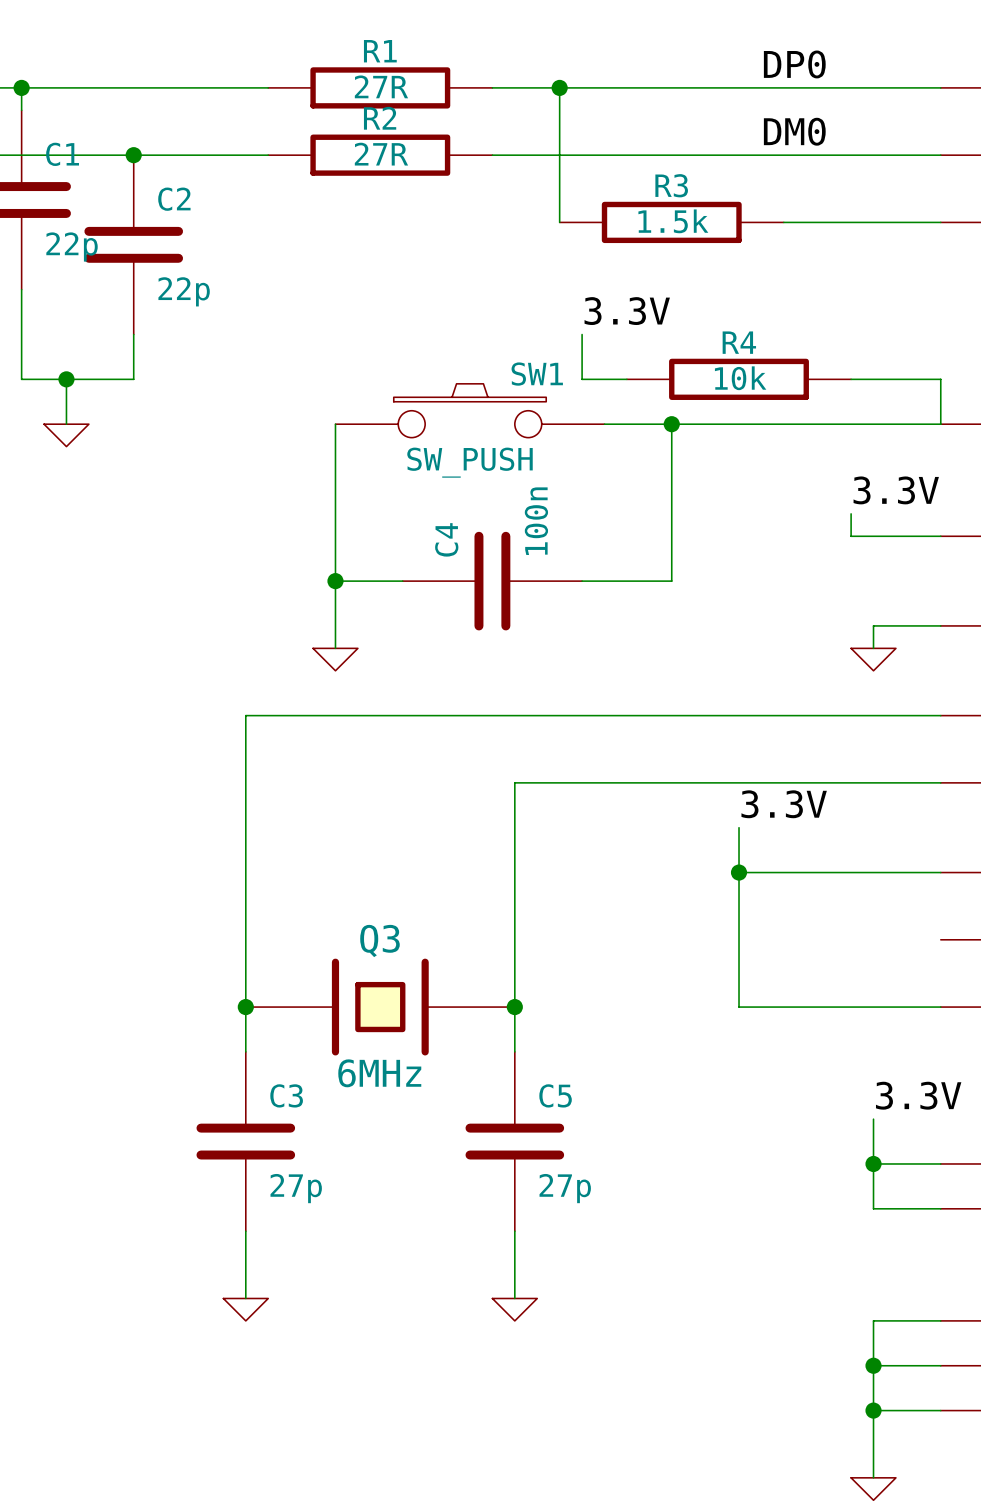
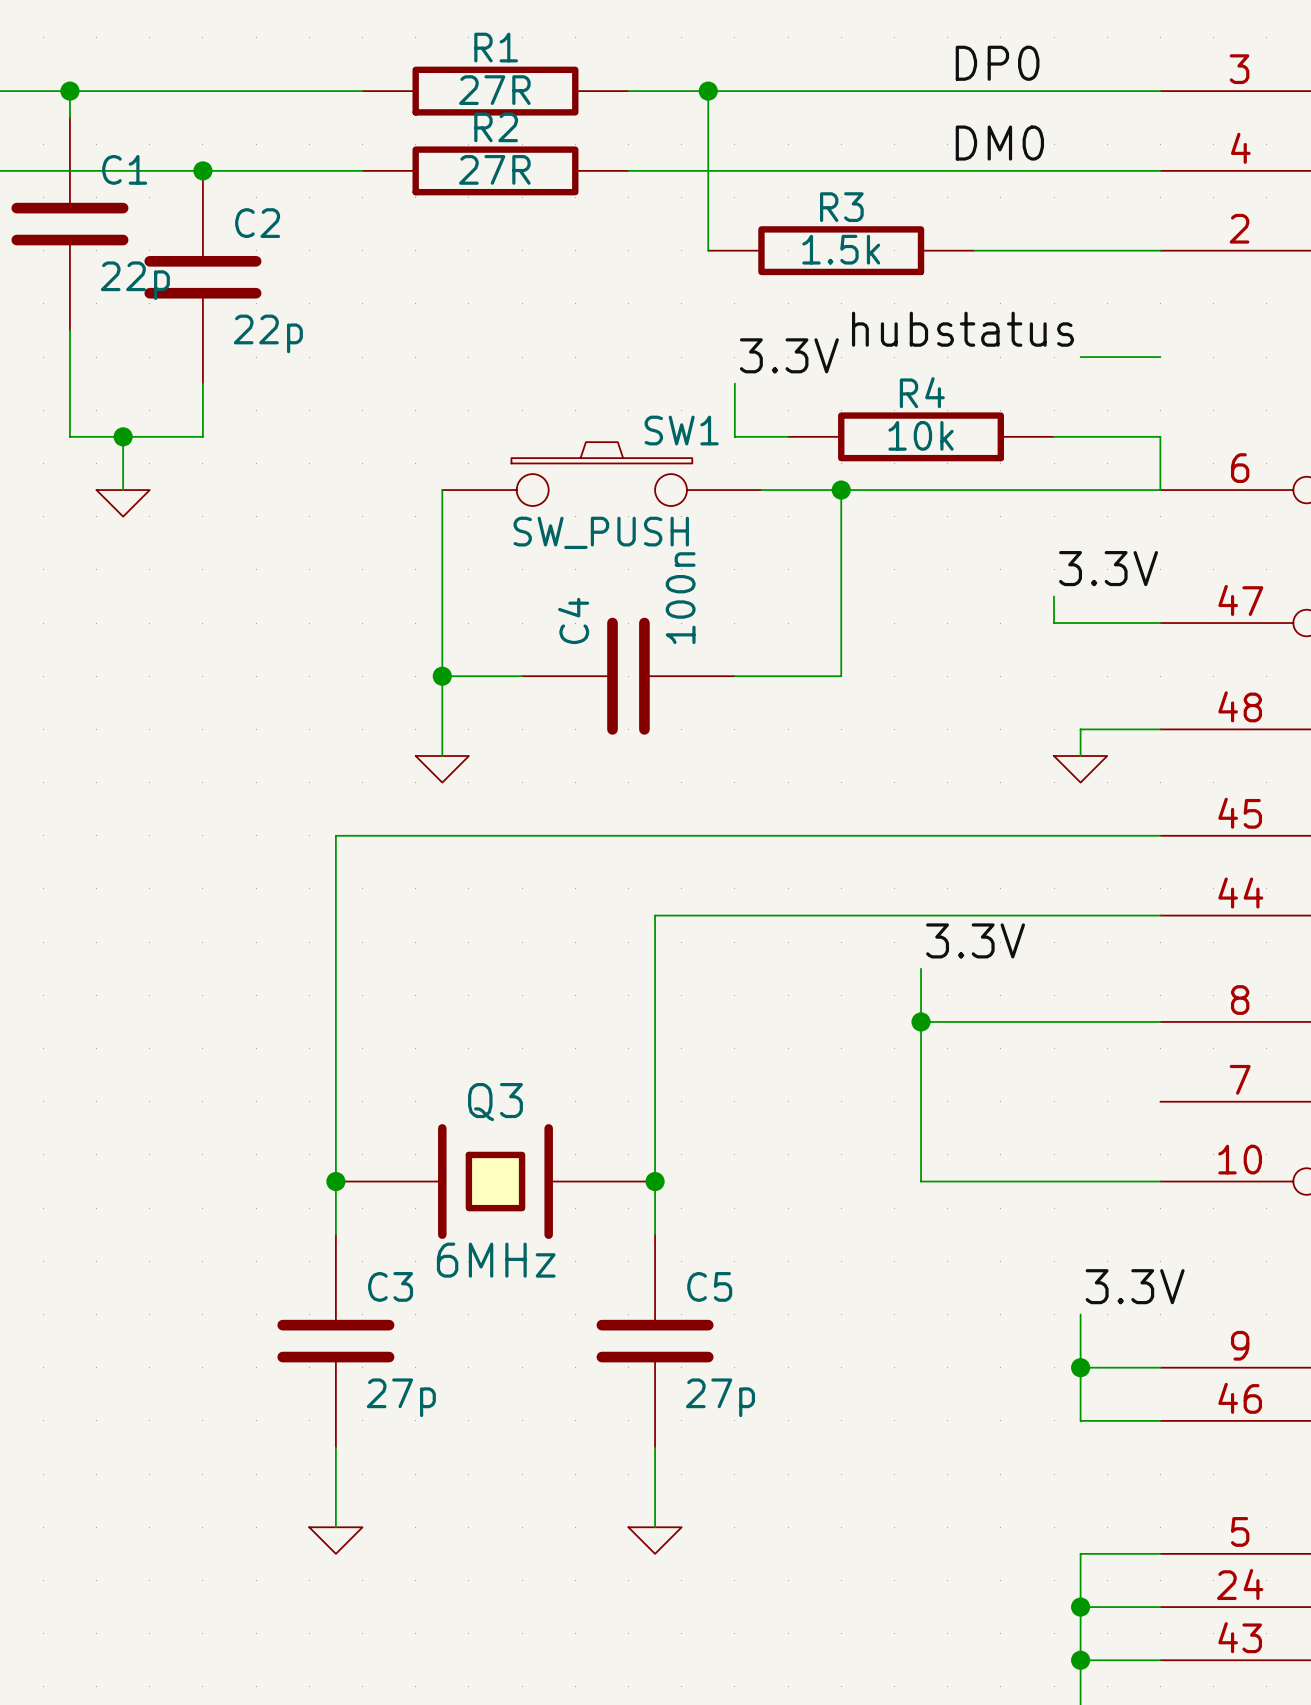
label: none -> hubstatus (962, 329)
wire: none -> (1080, 357) (1160, 357)

